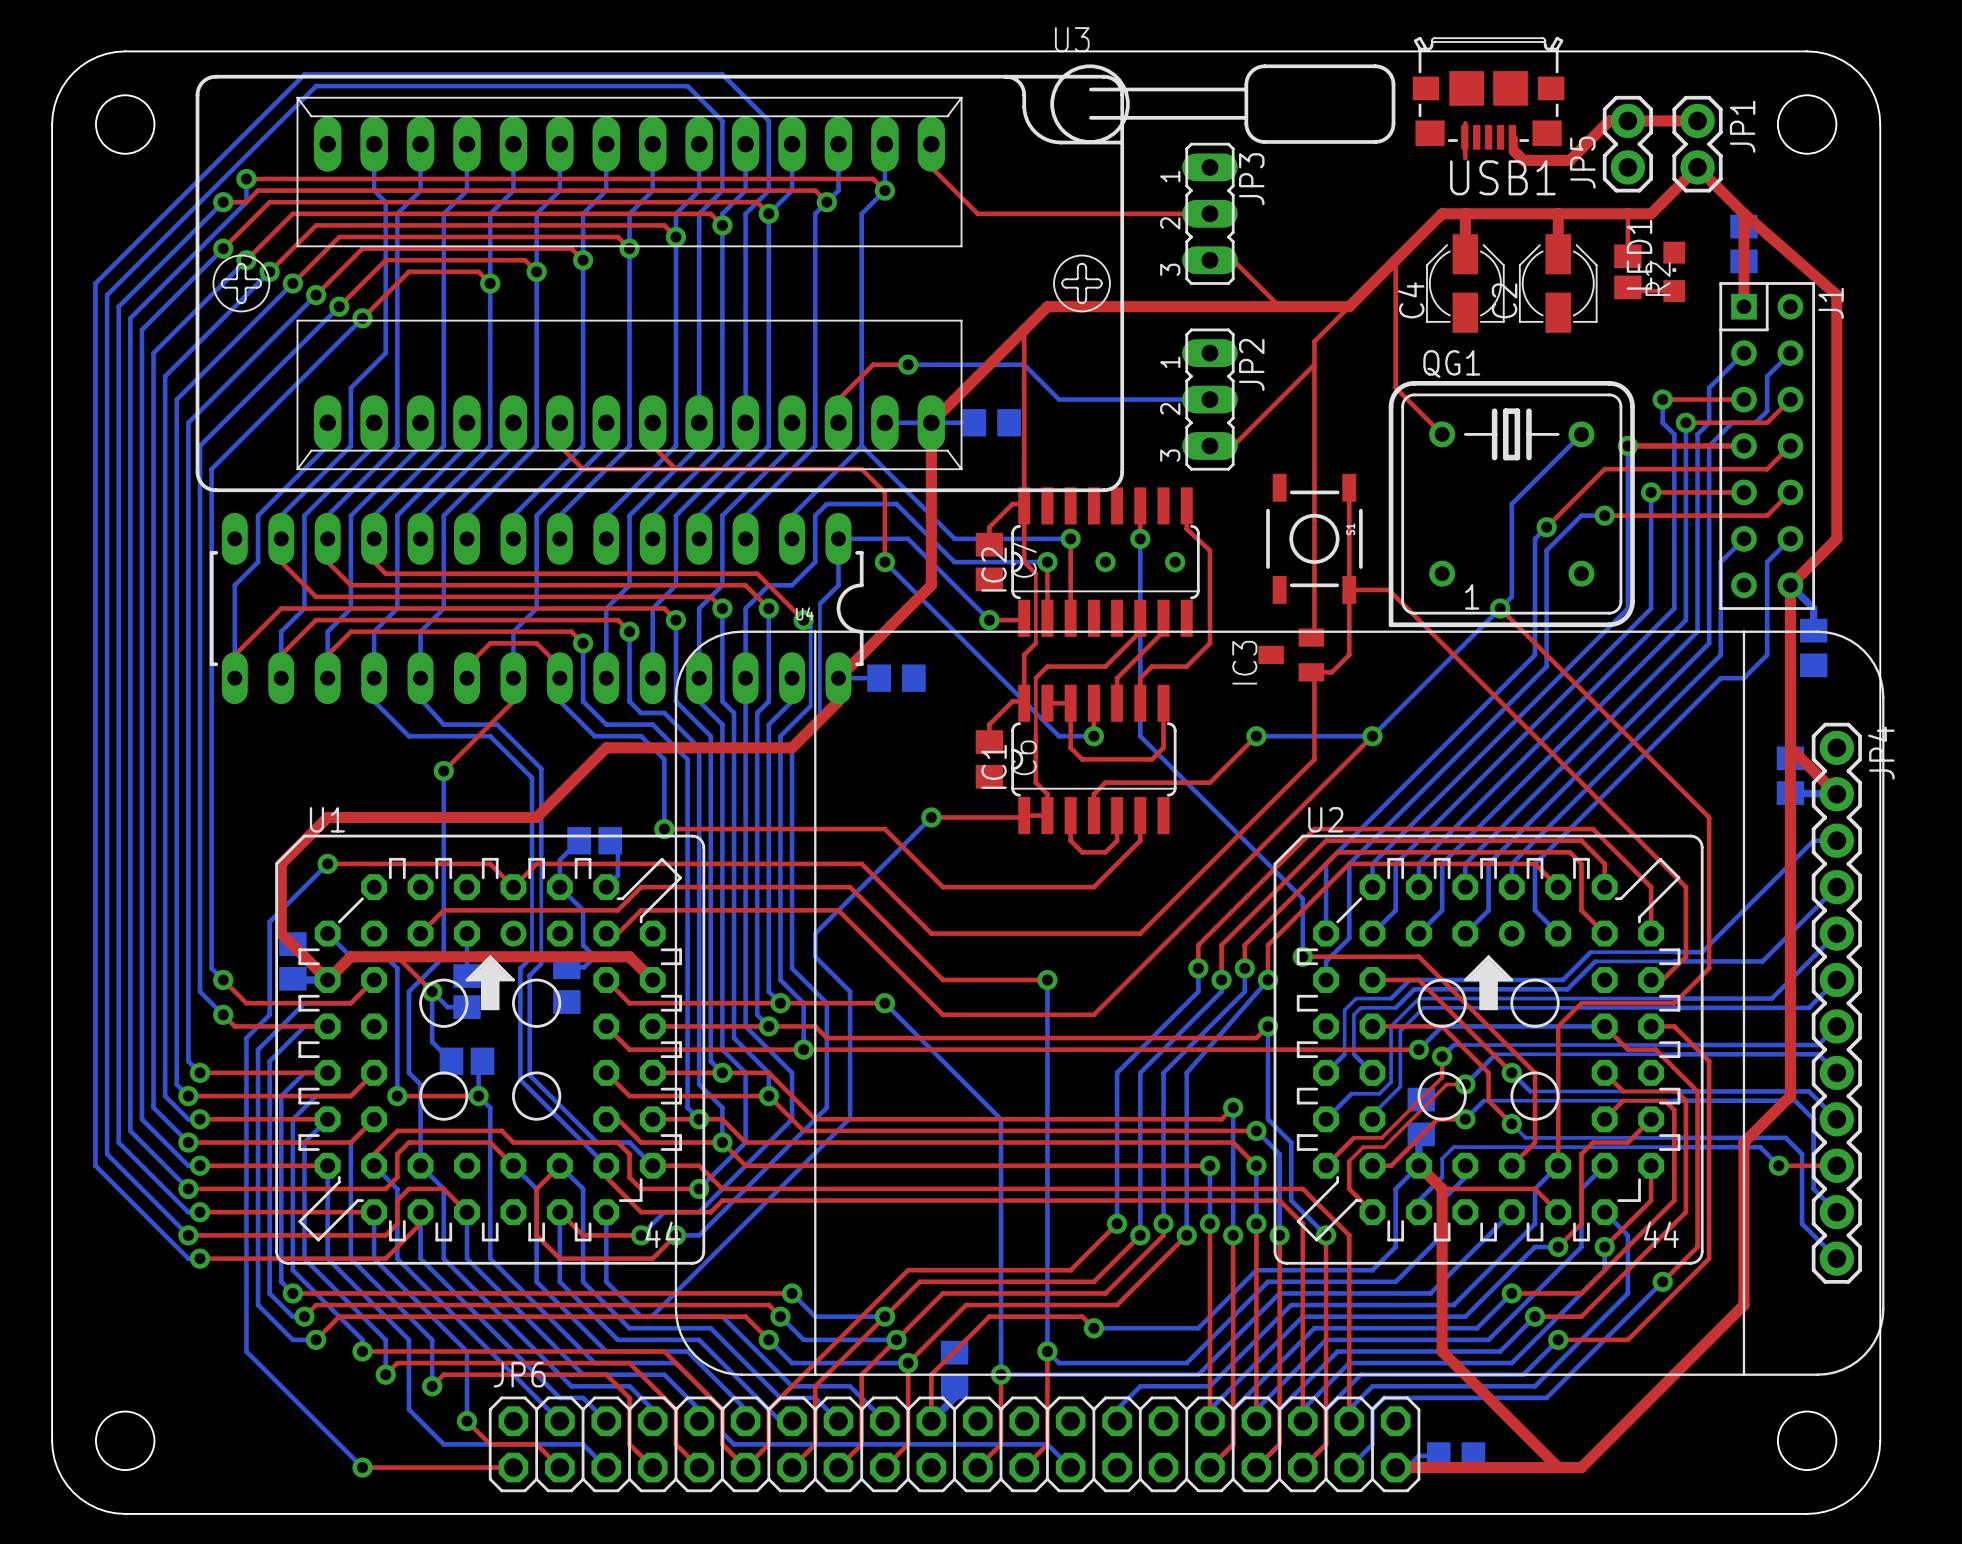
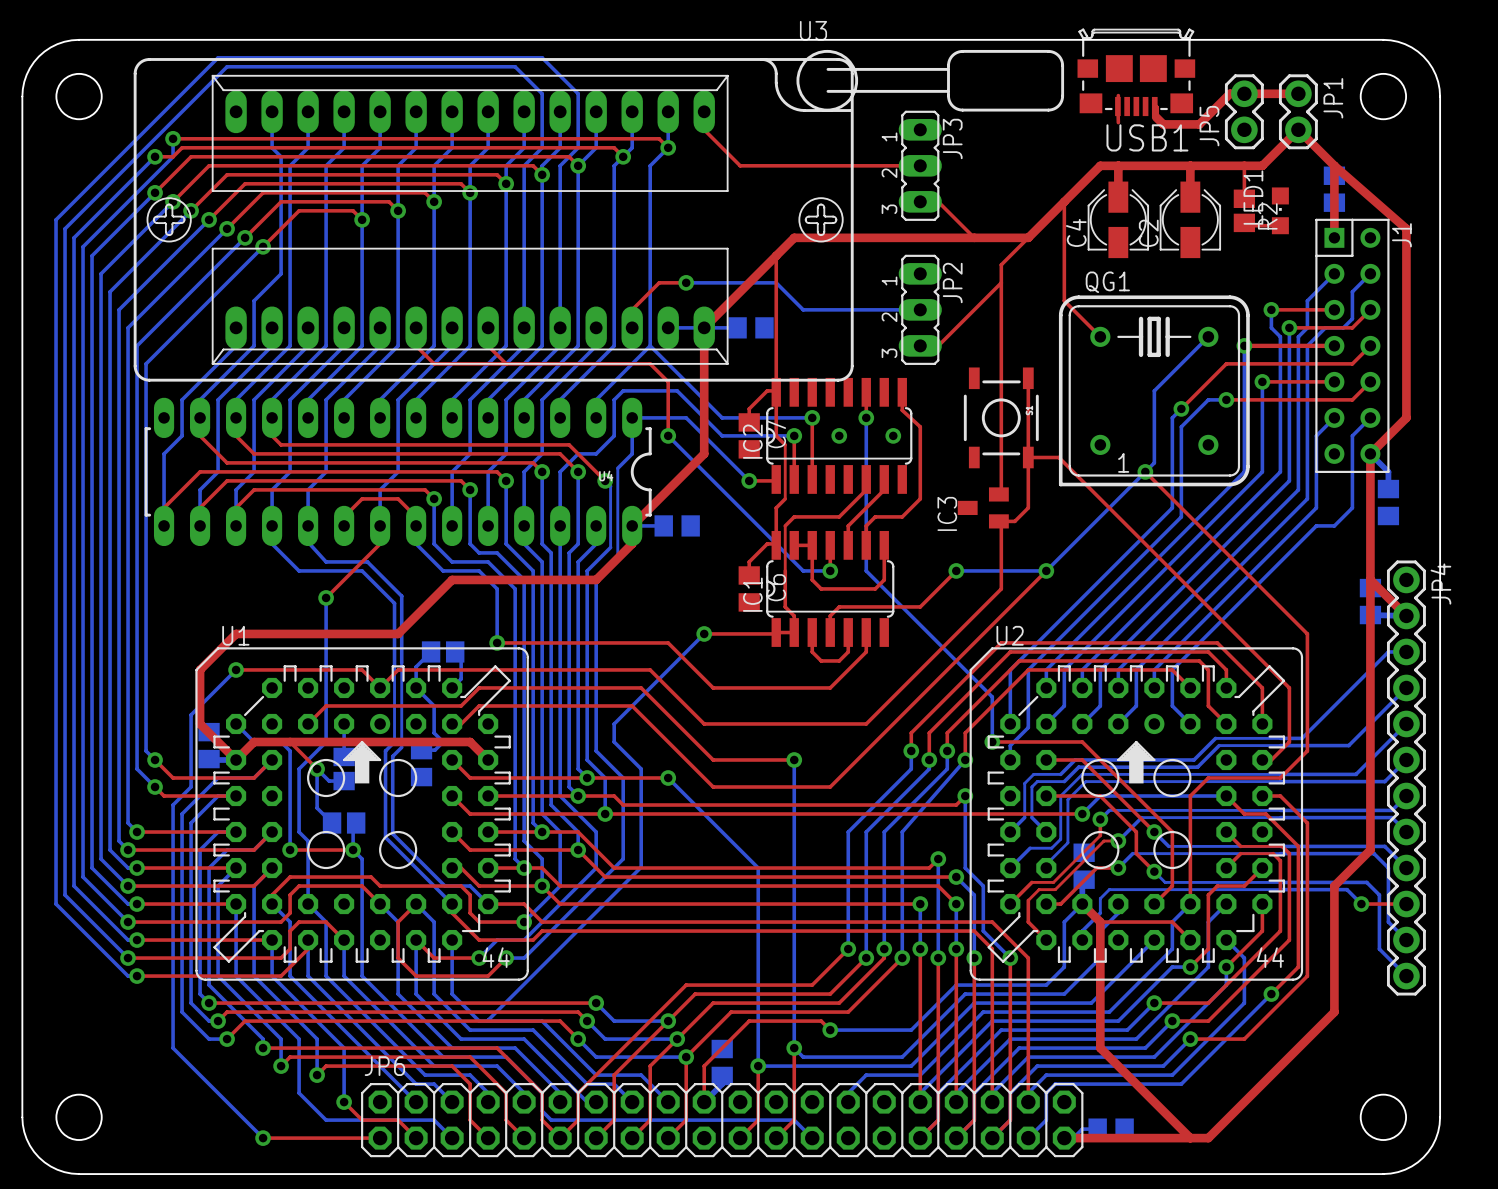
drawing: [674, 630, 1885, 1376] -> none

